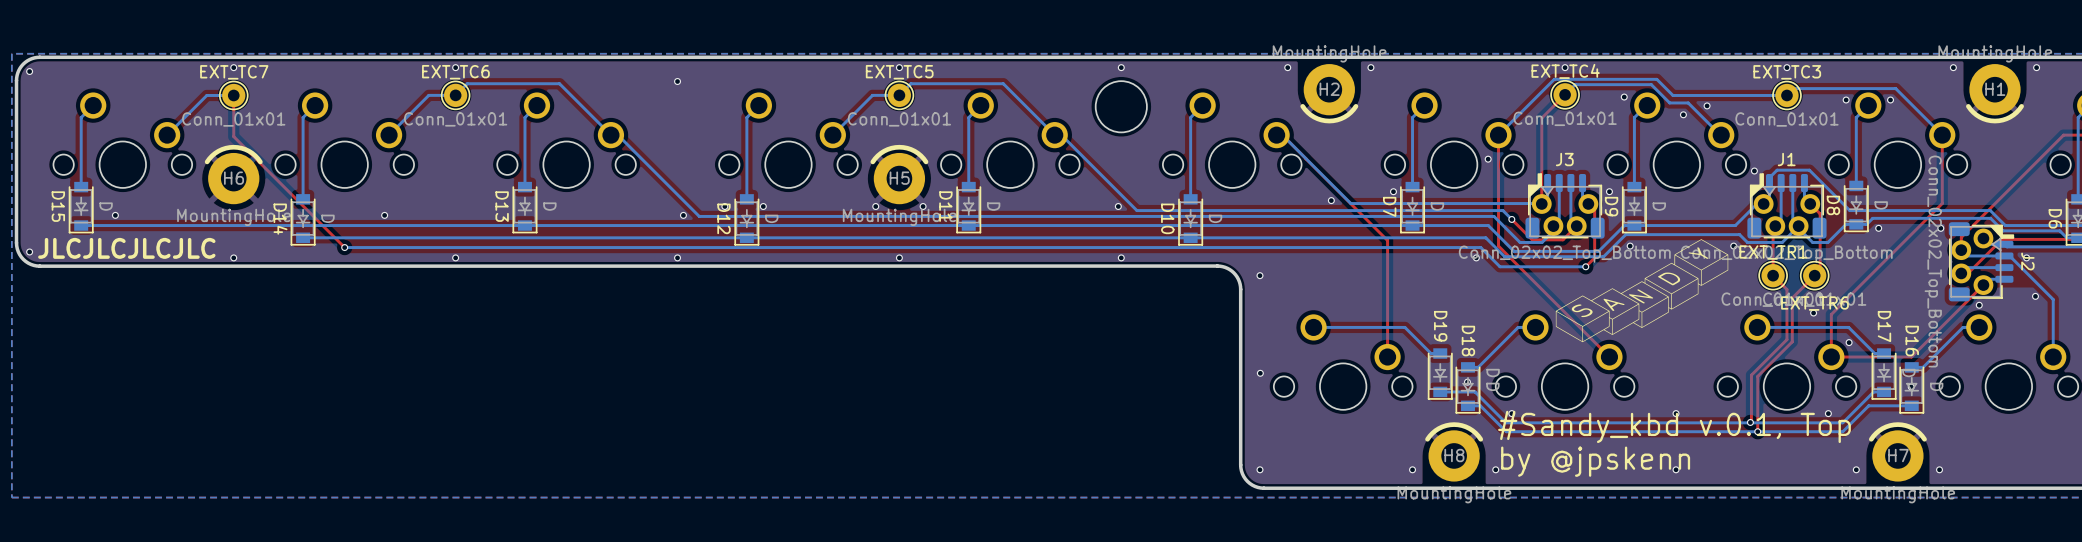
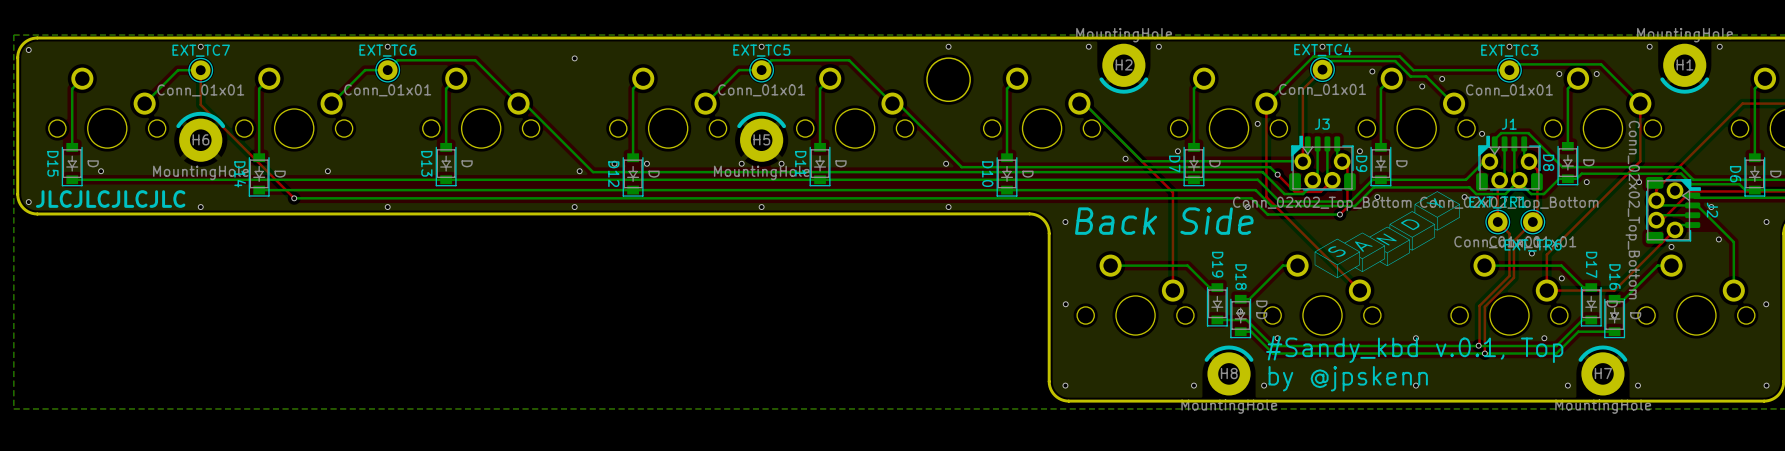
text: none -> Back Side (1164, 221)

